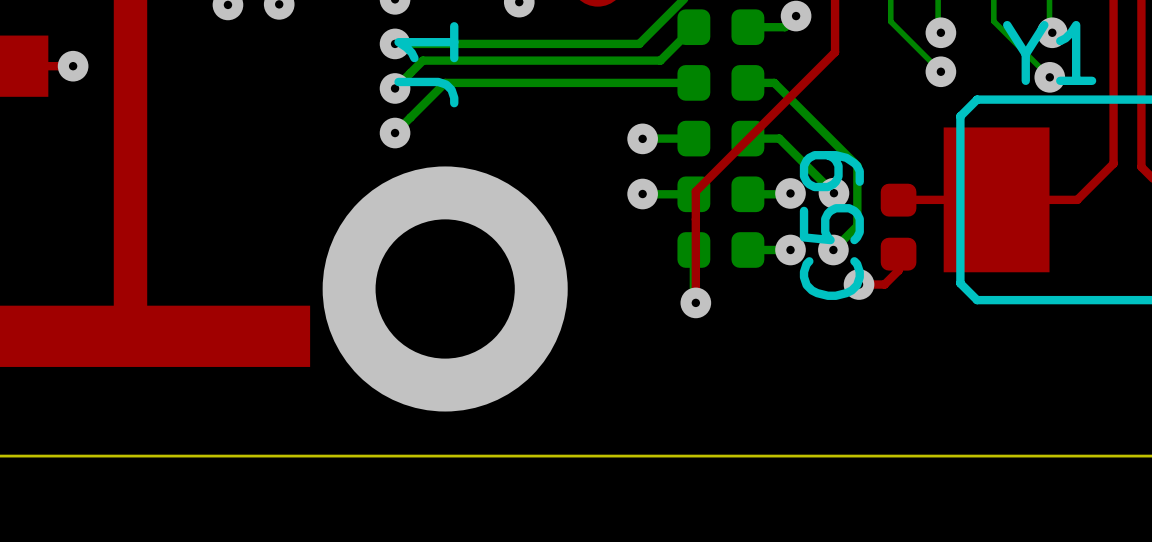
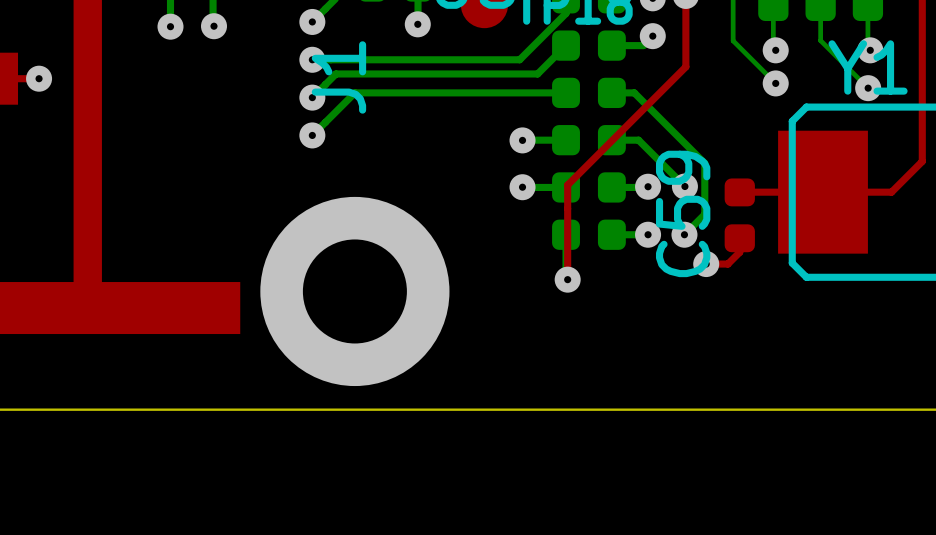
via size: [322, 166, 568, 412] -> [260, 196, 450, 387]

